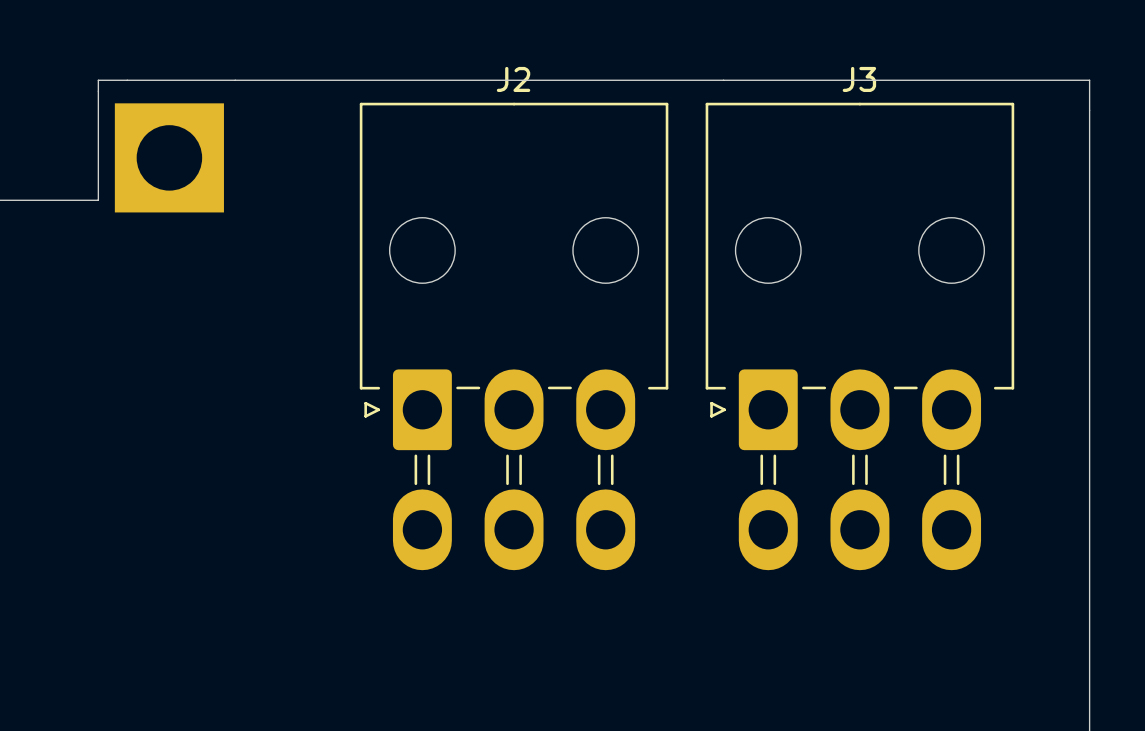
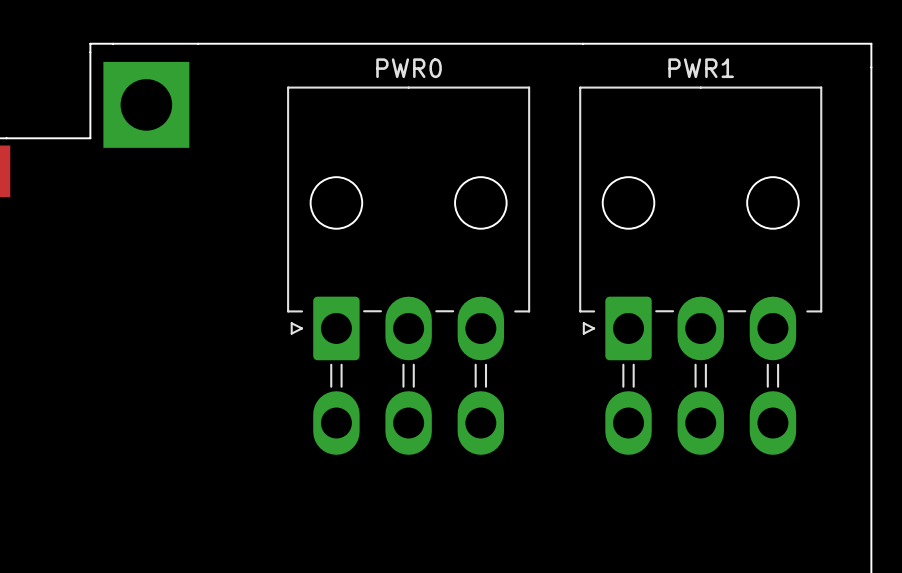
J2: (514, 336) -> none
J3: (859, 336) -> none
PWR0: none -> (408, 270)
PWR1: none -> (700, 270)

